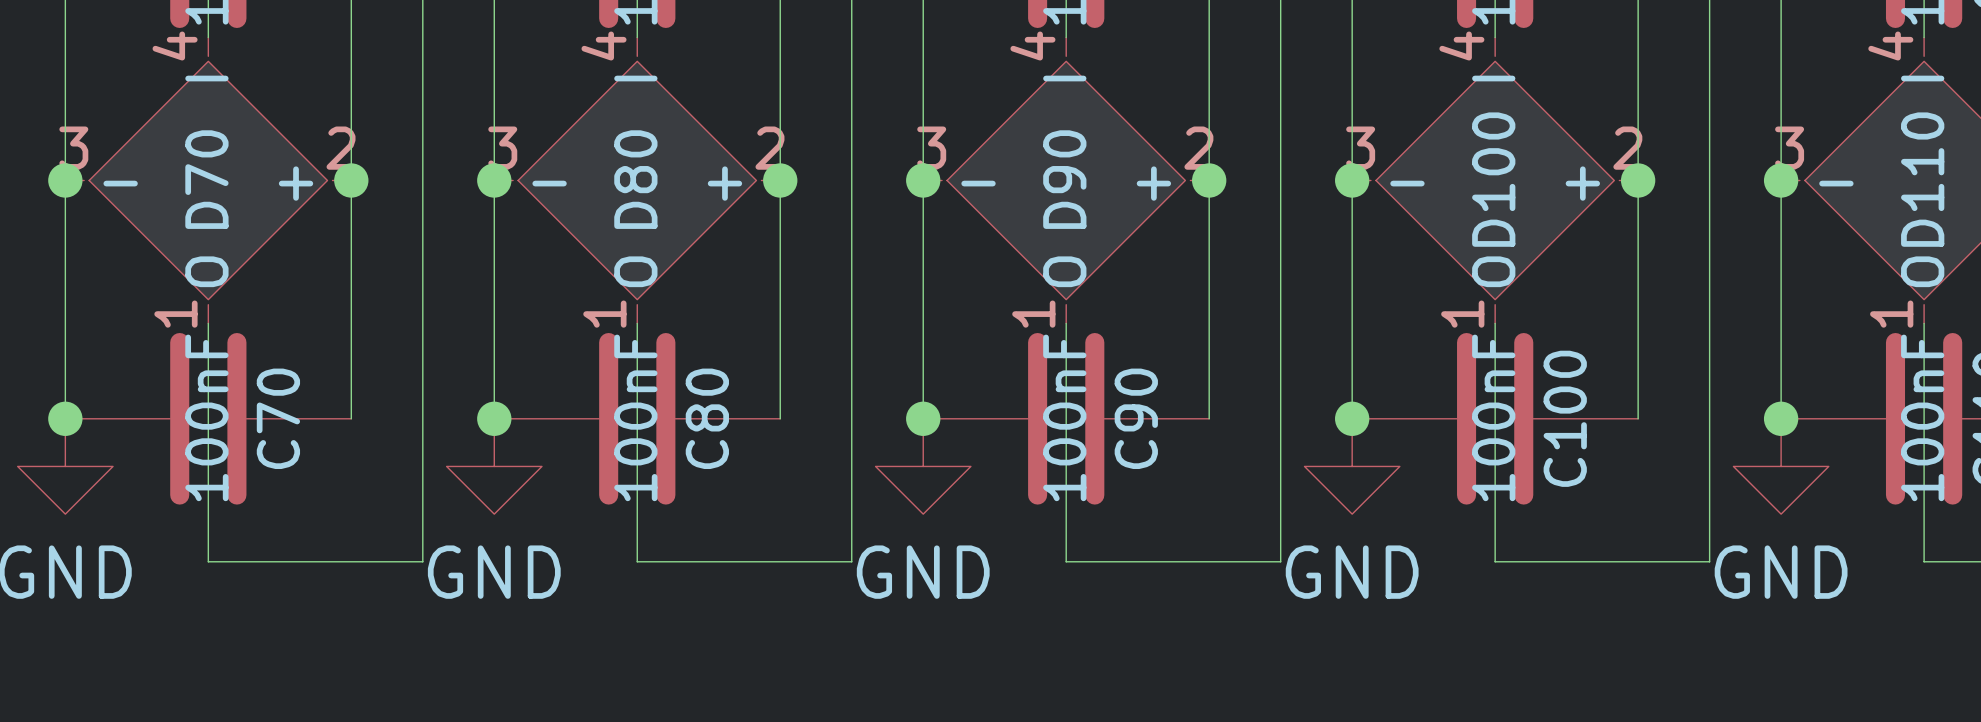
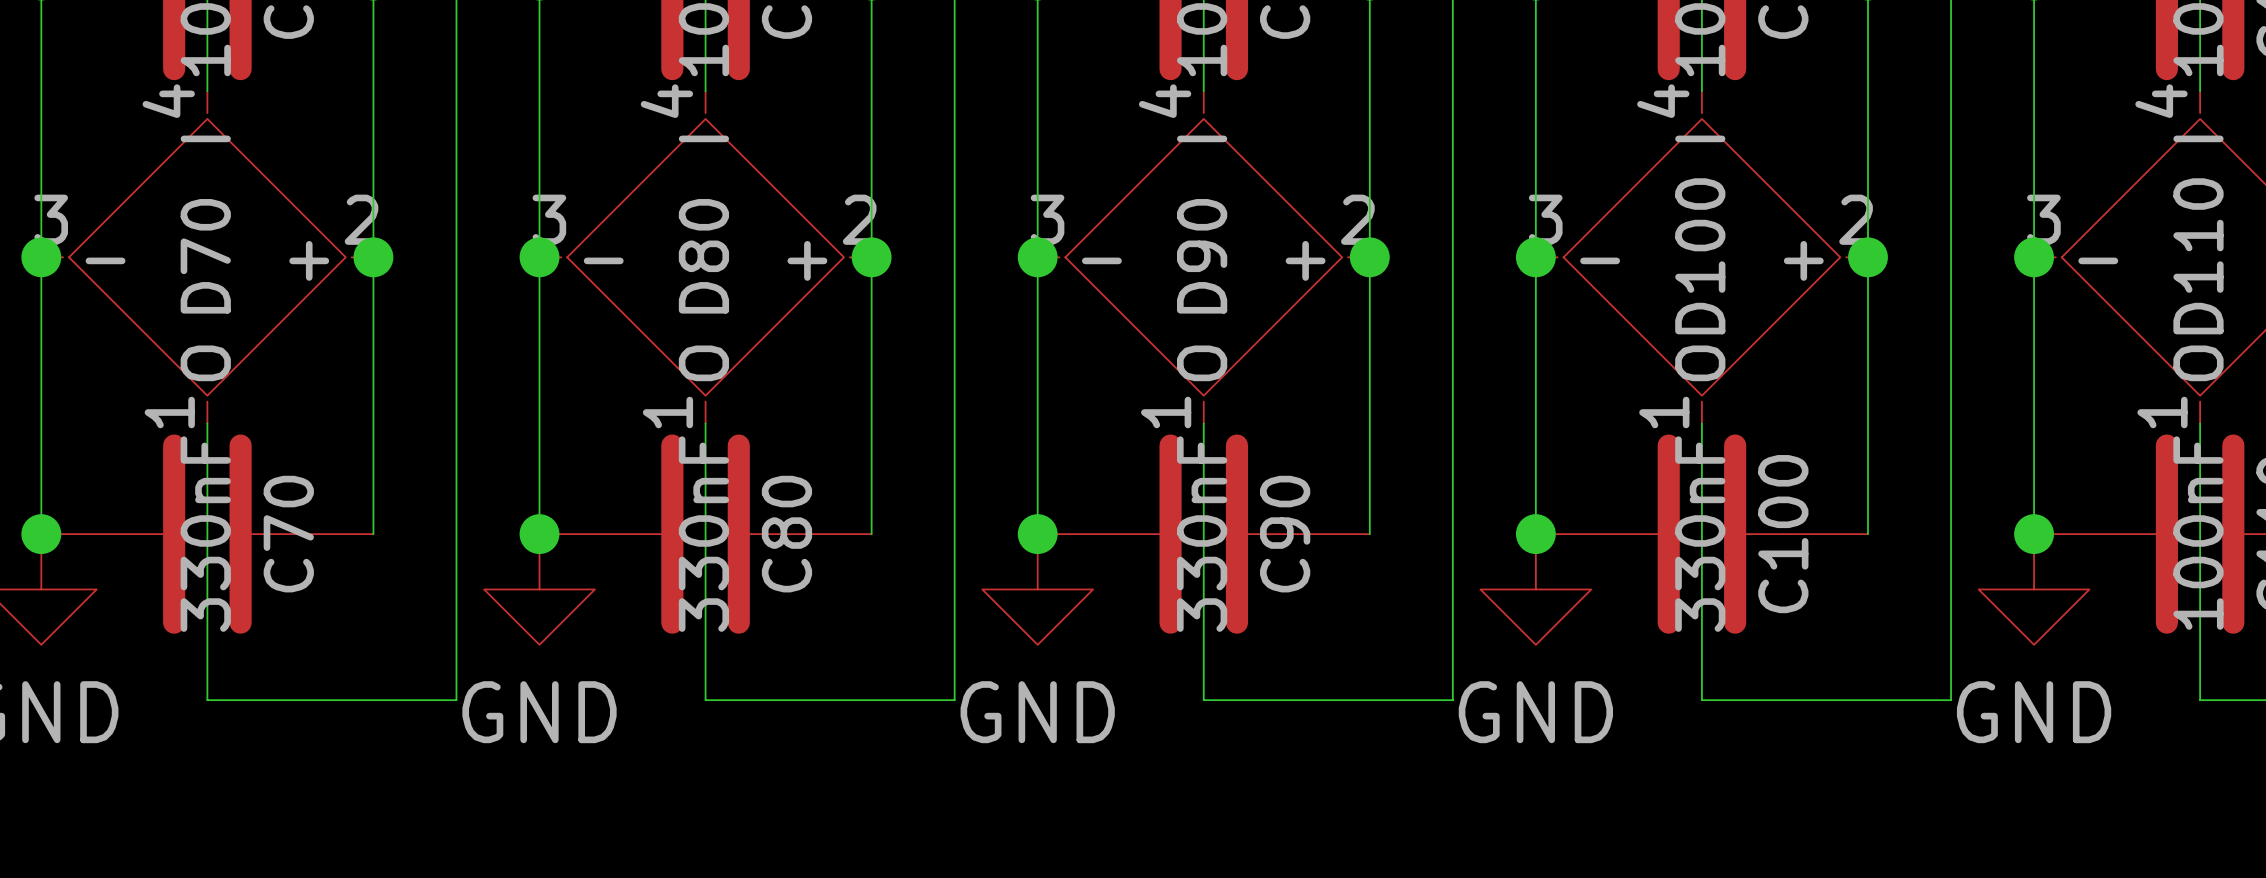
C70 value: 100nF (206, 417) -> 330nF (205, 534)
C80 value: 100nF (635, 417) -> 330nF (703, 534)
C90 value: 100nF (1064, 417) -> 330nF (1202, 534)
C100 value: 100nF (1493, 417) -> 330nF (1700, 534)

